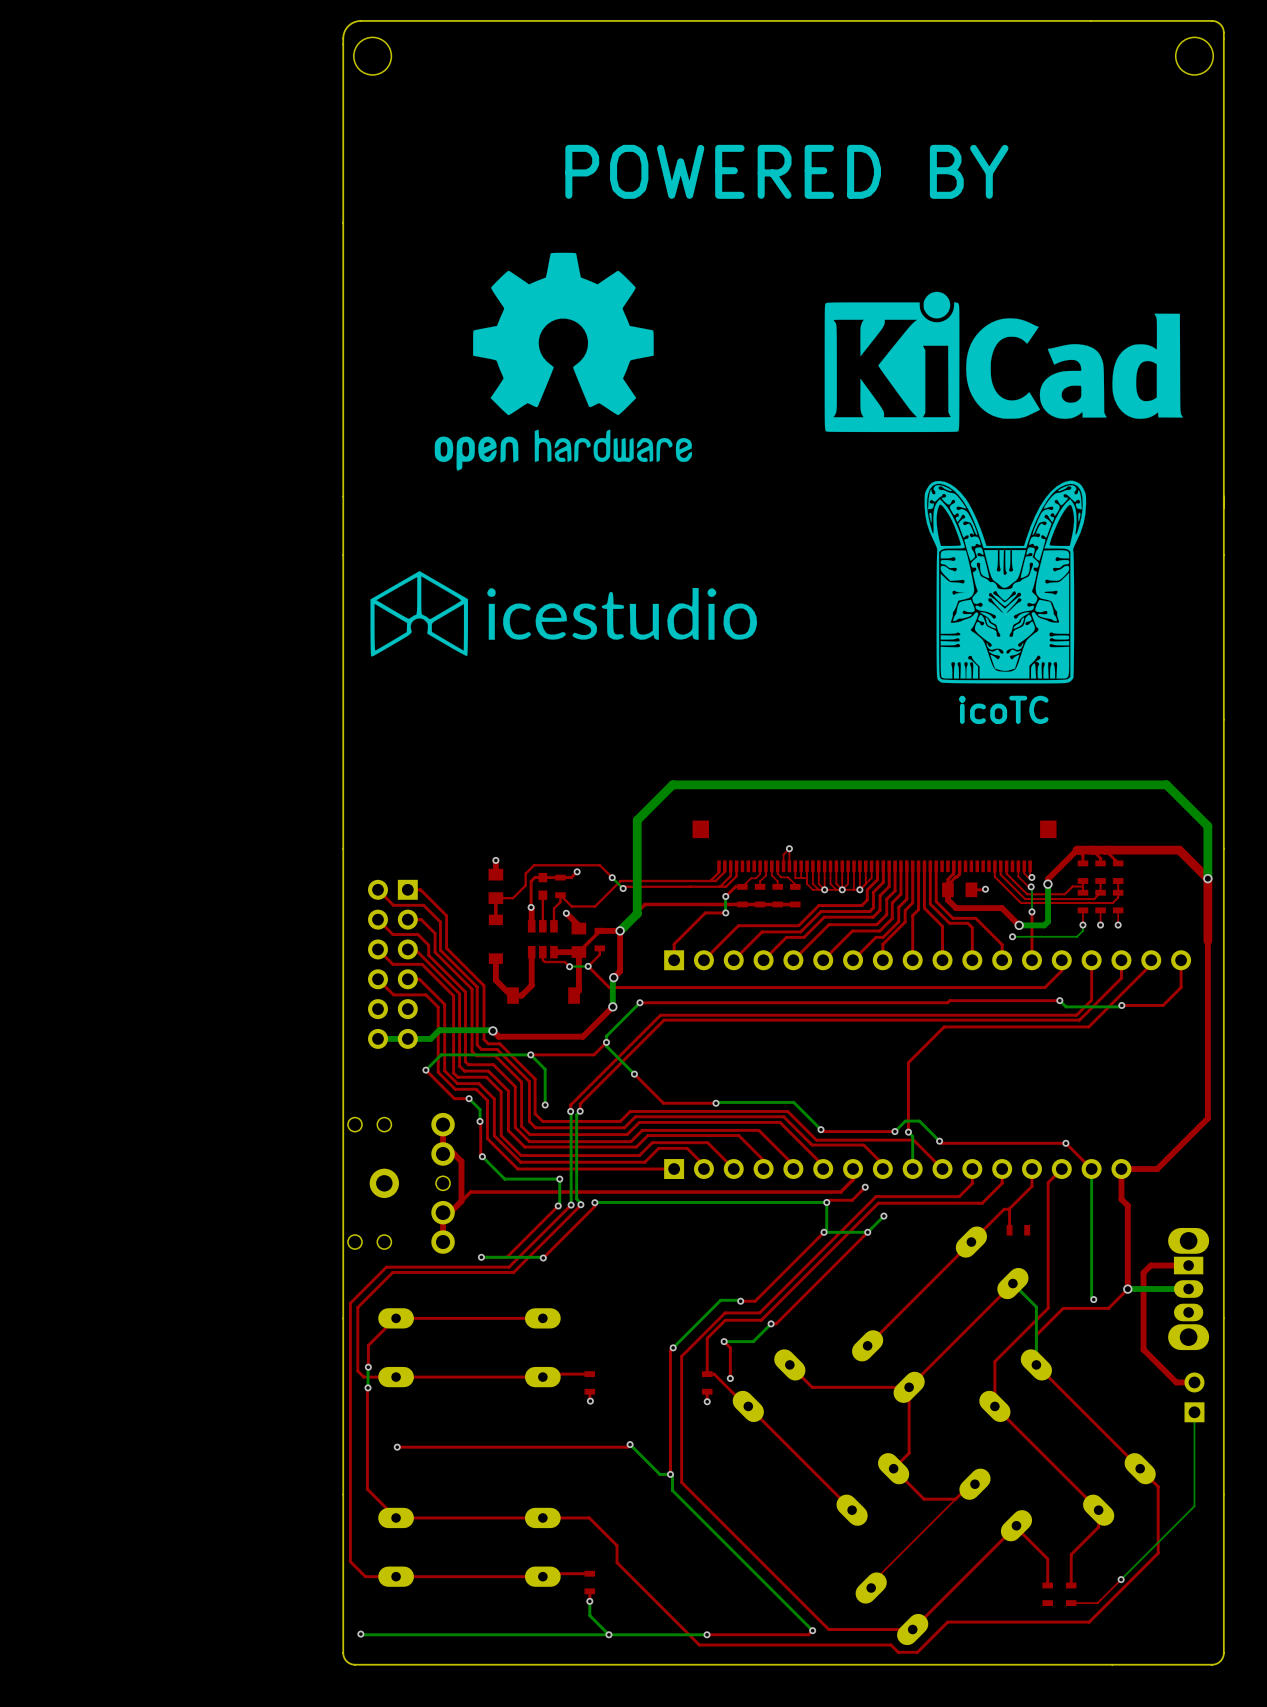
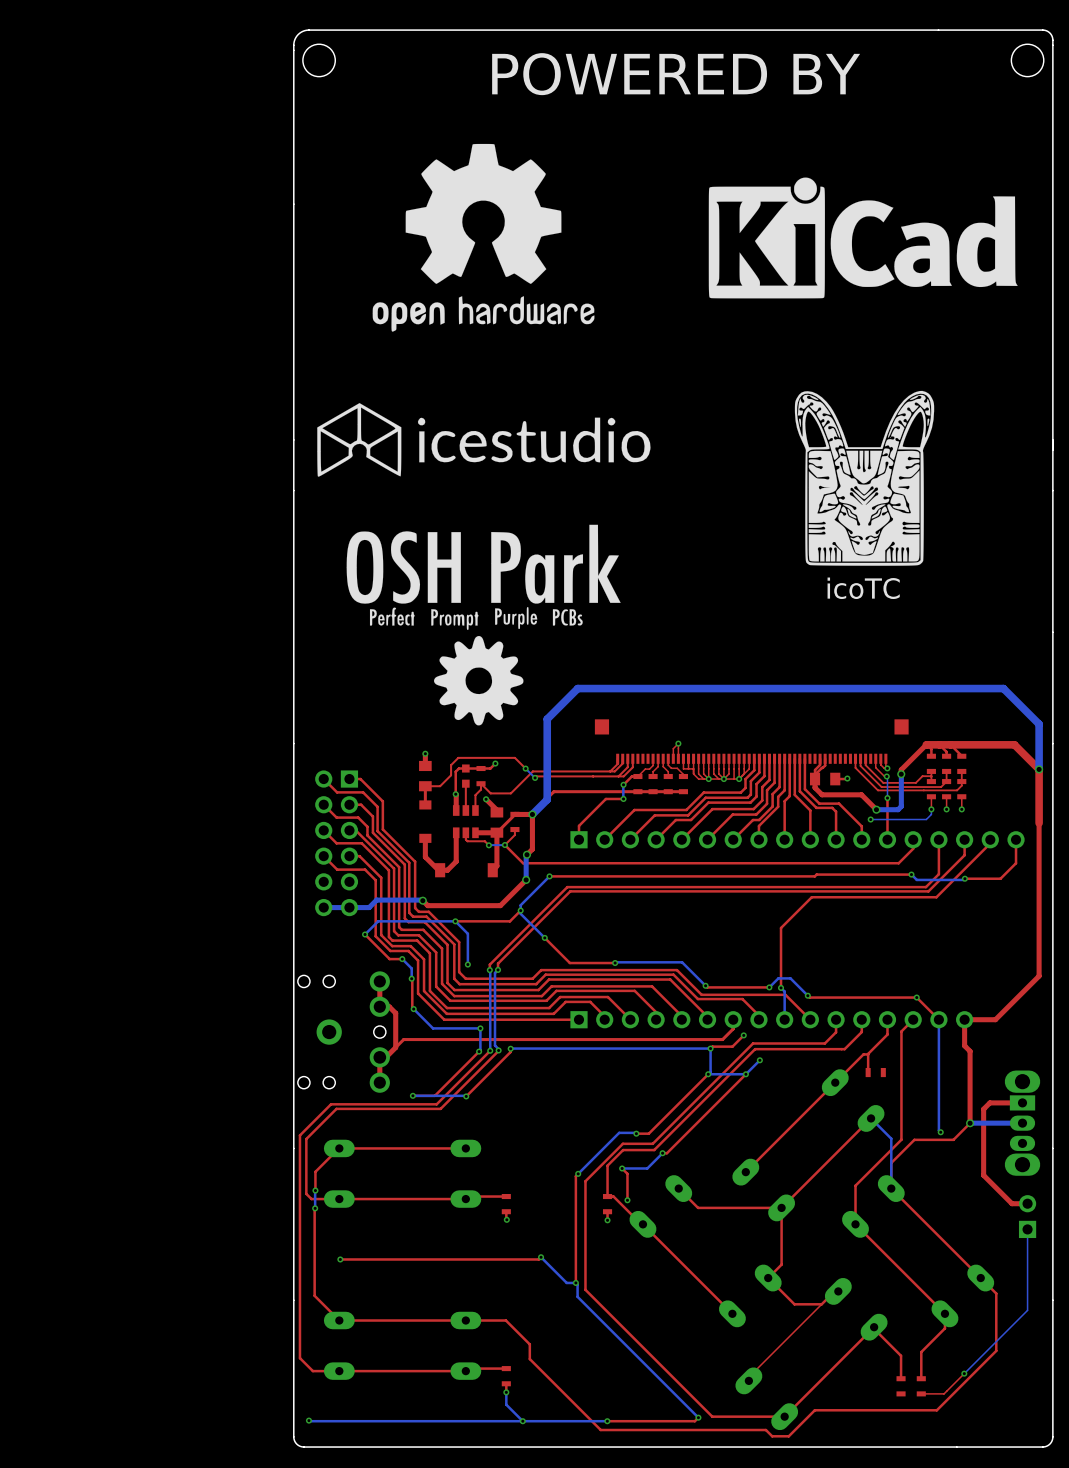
text position: POWERED BY (786, 171) -> POWERED BY (676, 74)
drawing position: (563, 361) -> (483, 237)
drawing position: (1003, 361) -> (863, 237)
drawing position: (1005, 582) -> (864, 478)
drawing: none -> [346, 524, 621, 726]
drawing position: (563, 613) -> (483, 439)
text position: icoTC (1003, 709) -> icoTC (863, 588)

